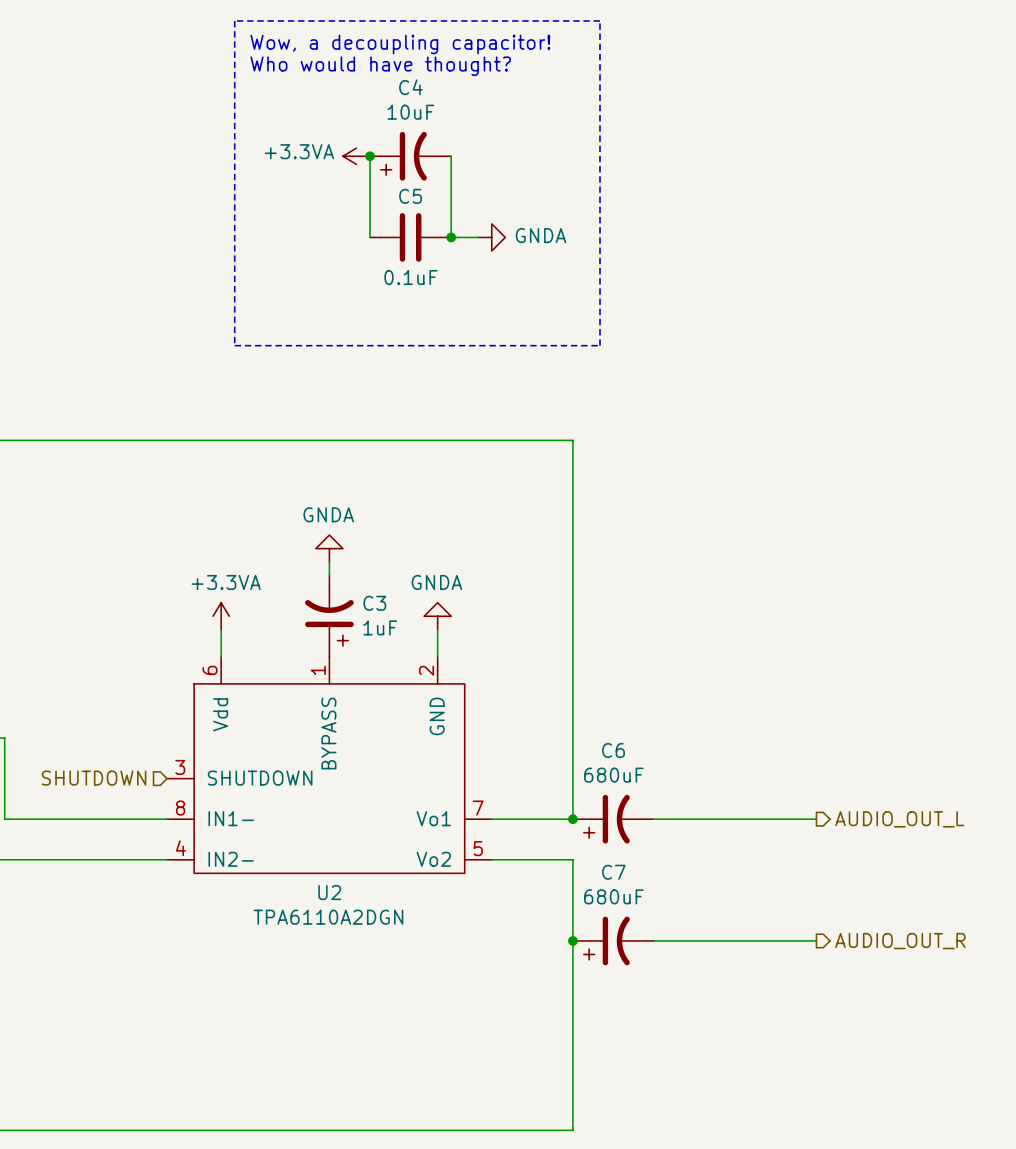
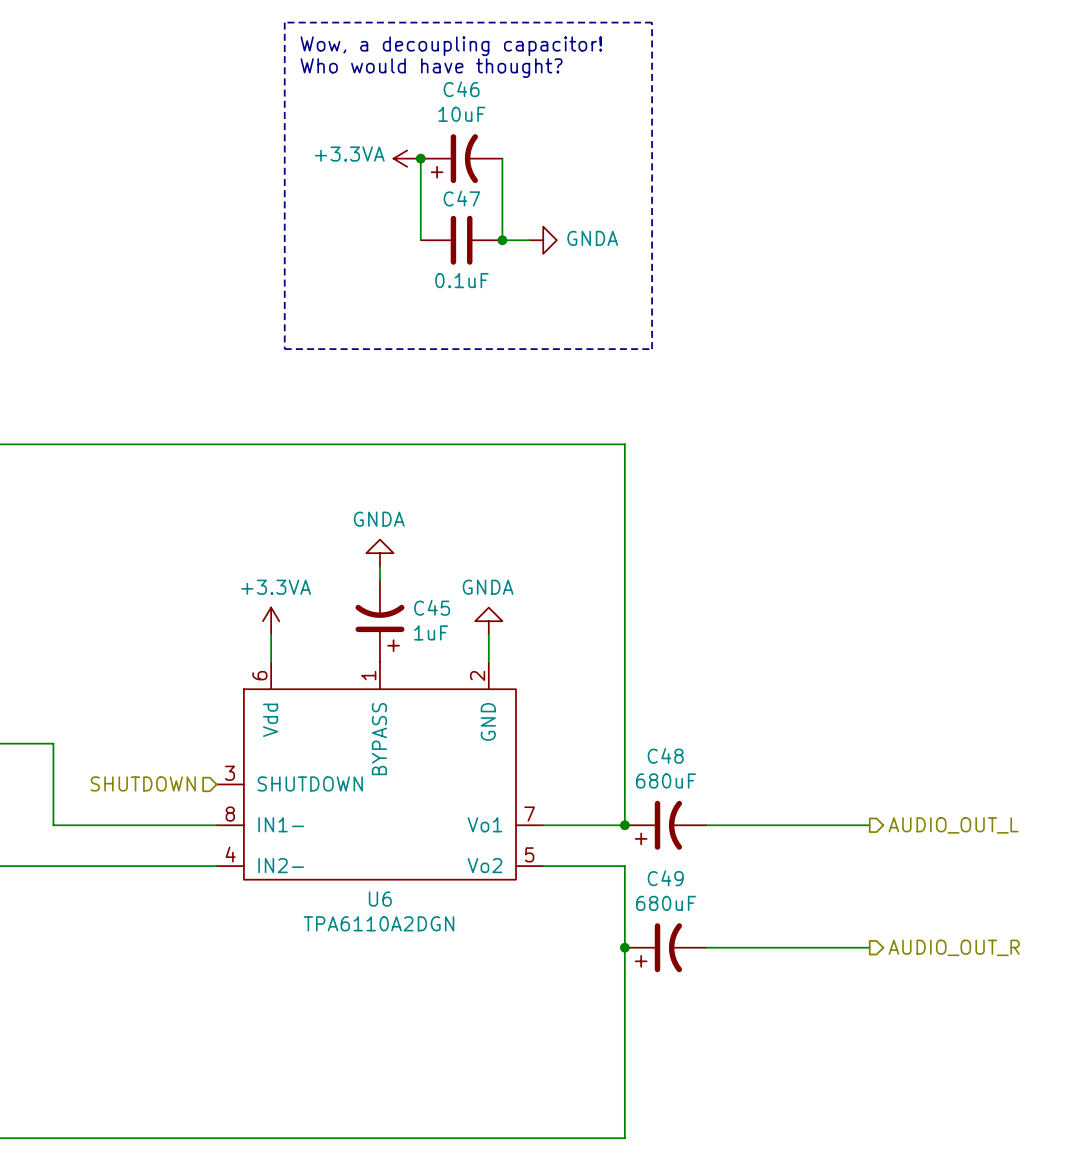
C4 name: C4 (410, 87) -> C46 (461, 89)
C5 name: C5 (410, 196) -> C47 (461, 198)
C3 name: C3 (374, 603) -> C45 (432, 607)
C6 name: C6 (613, 750) -> C48 (665, 755)
C7 name: C7 (613, 872) -> C49 (665, 878)
U2 name: U2 (329, 892) -> U6 (380, 899)

